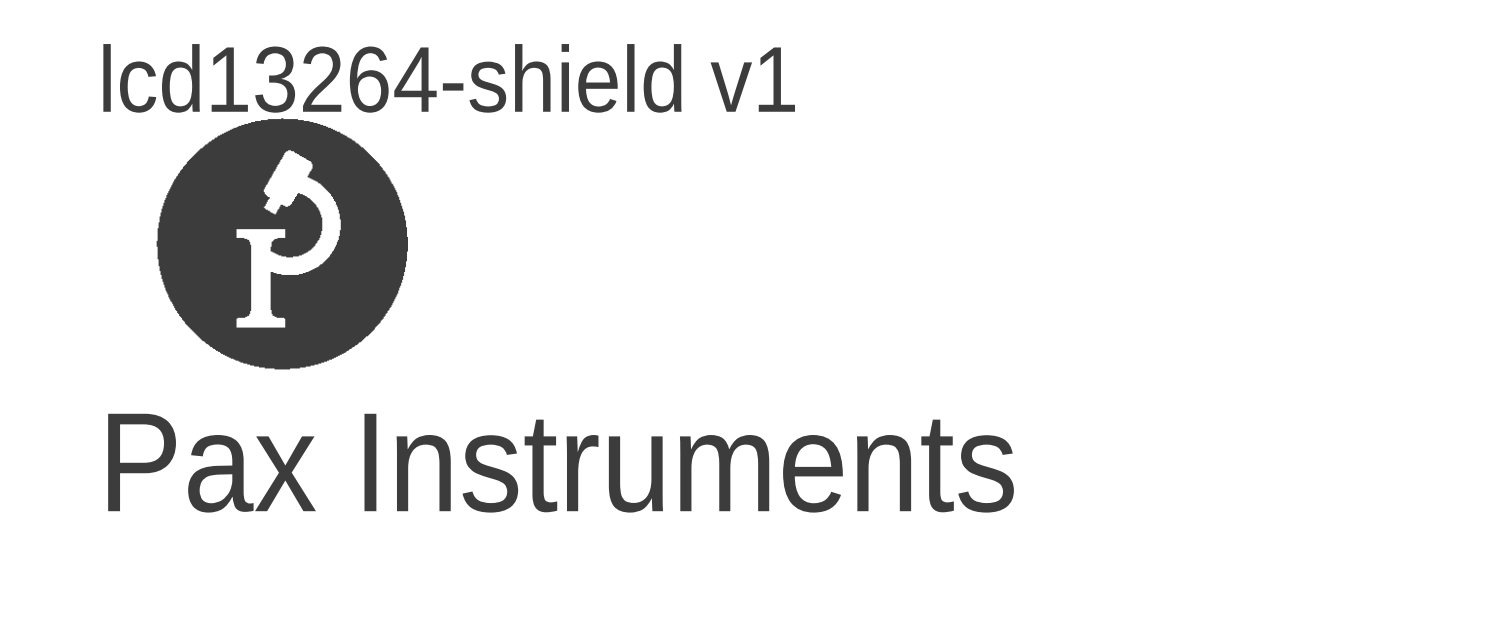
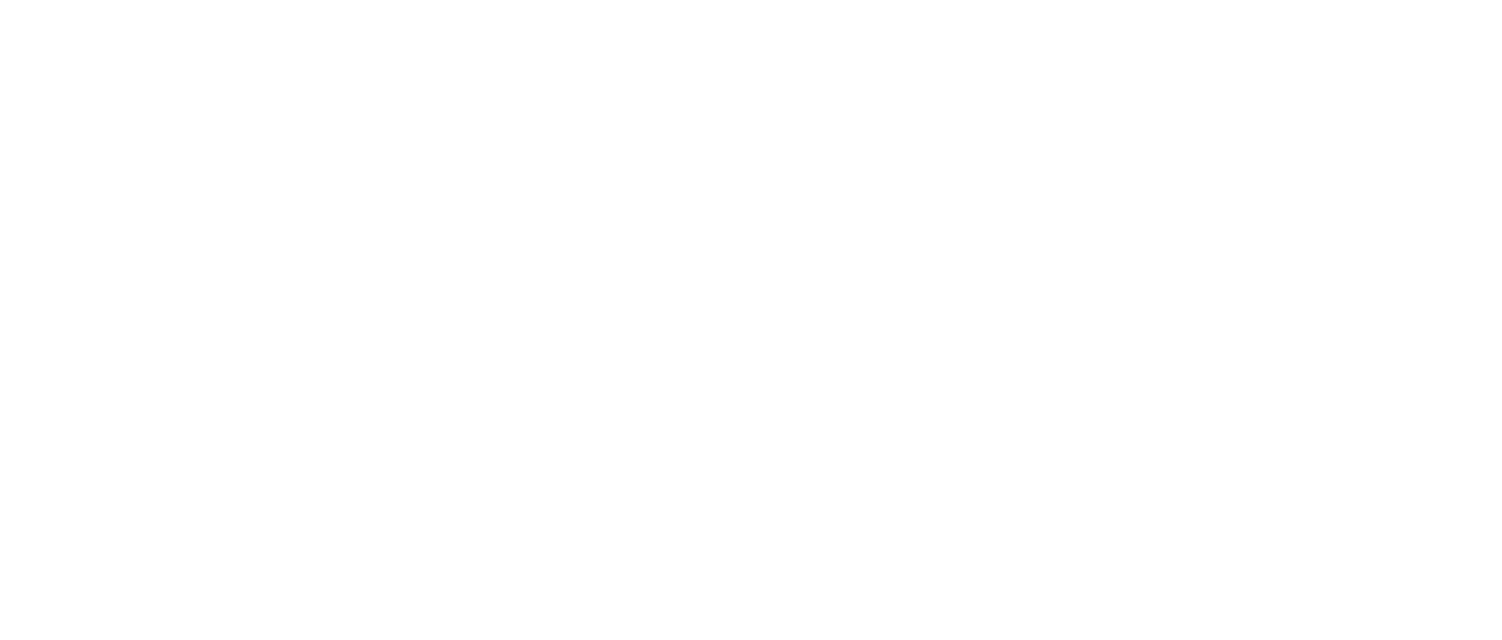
text: lcd13264-shield v1 (449, 78) -> none
drawing: [156, 118, 408, 370] -> none
text: Pax Instruments (561, 463) -> none

